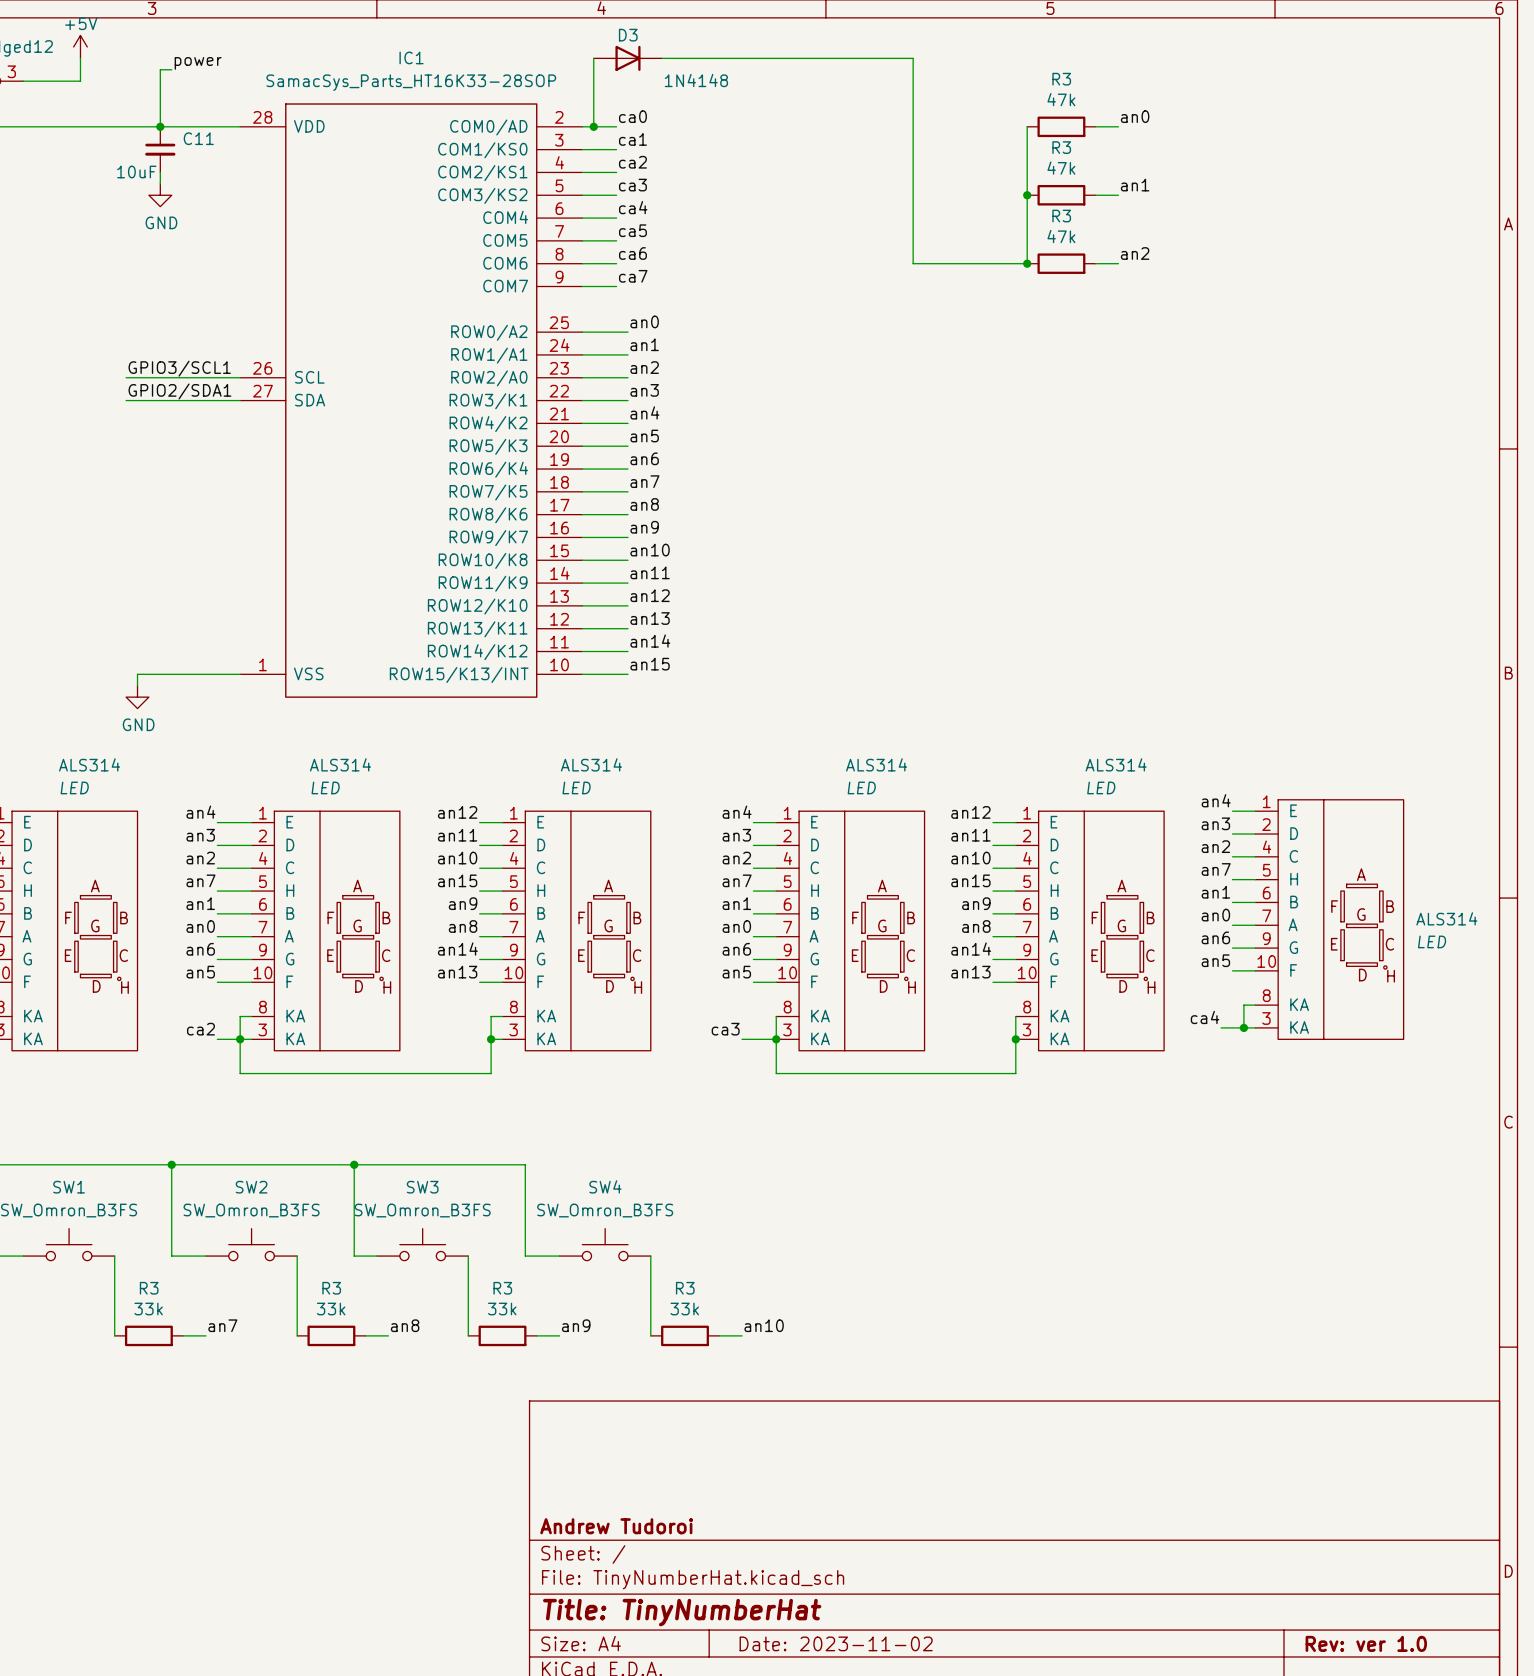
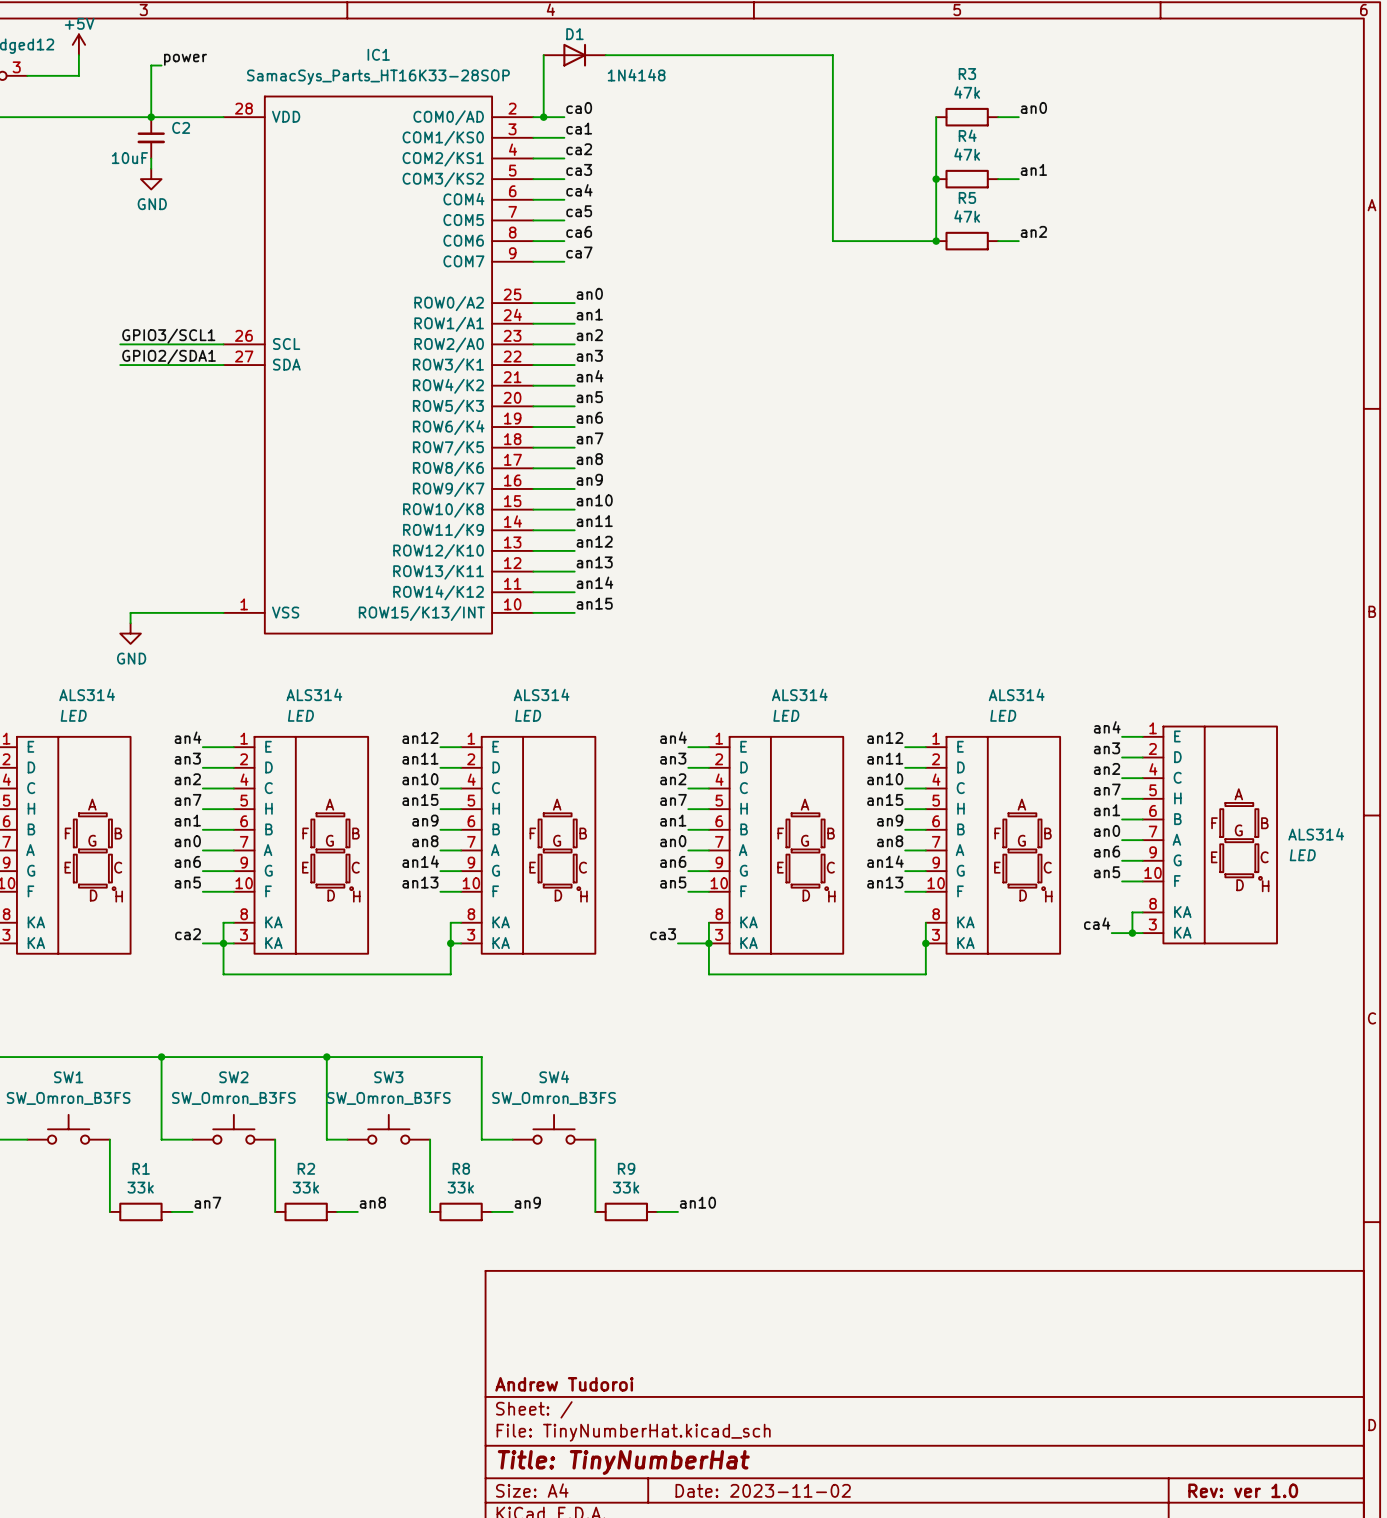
D3 name: D3 (628, 35) -> D1 (574, 34)
C11 name: C11 (198, 138) -> C2 (181, 127)
R3 name: R3 (1061, 147) -> R4 (967, 135)
R3 name: R3 (1061, 216) -> R5 (967, 197)
R3 name: R3 (149, 1288) -> R1 (141, 1168)
R3 name: R3 (331, 1288) -> R2 (306, 1168)
R3 name: R3 (502, 1288) -> R8 (461, 1168)
R3 name: R3 (685, 1288) -> R9 (626, 1168)

